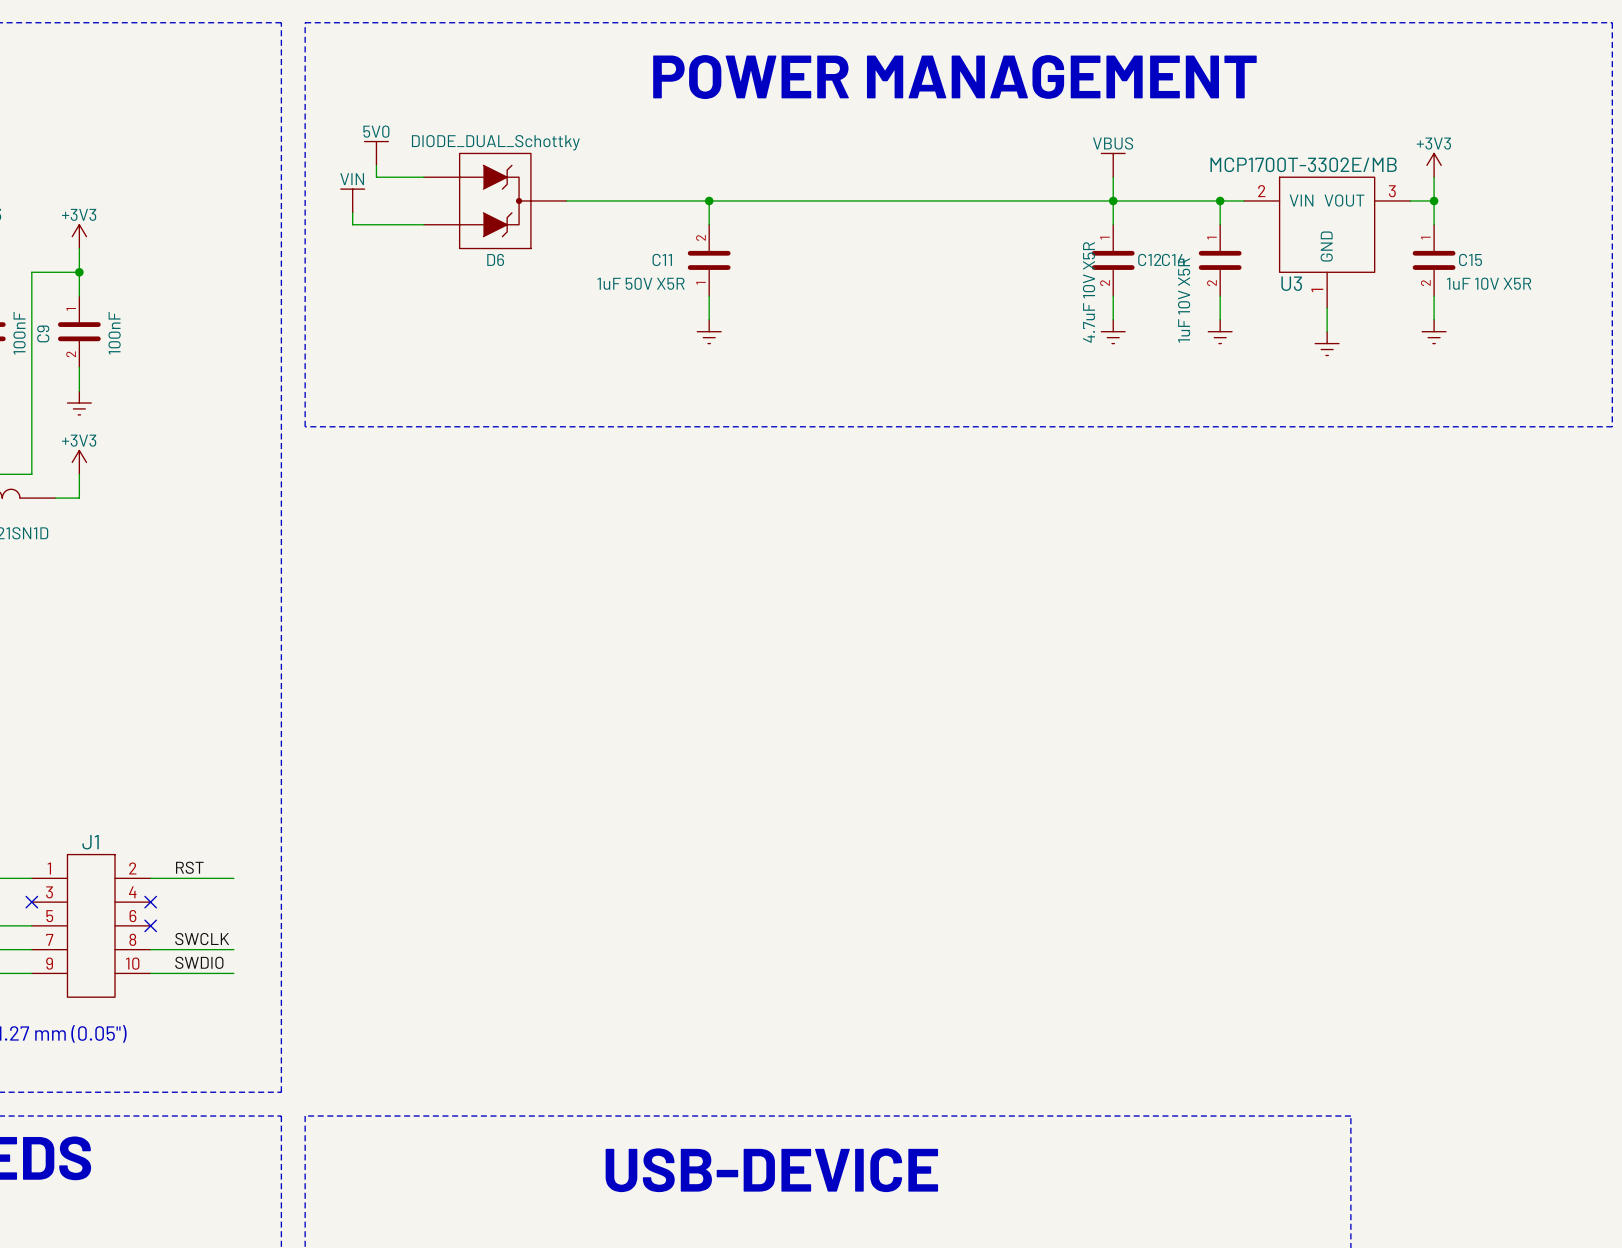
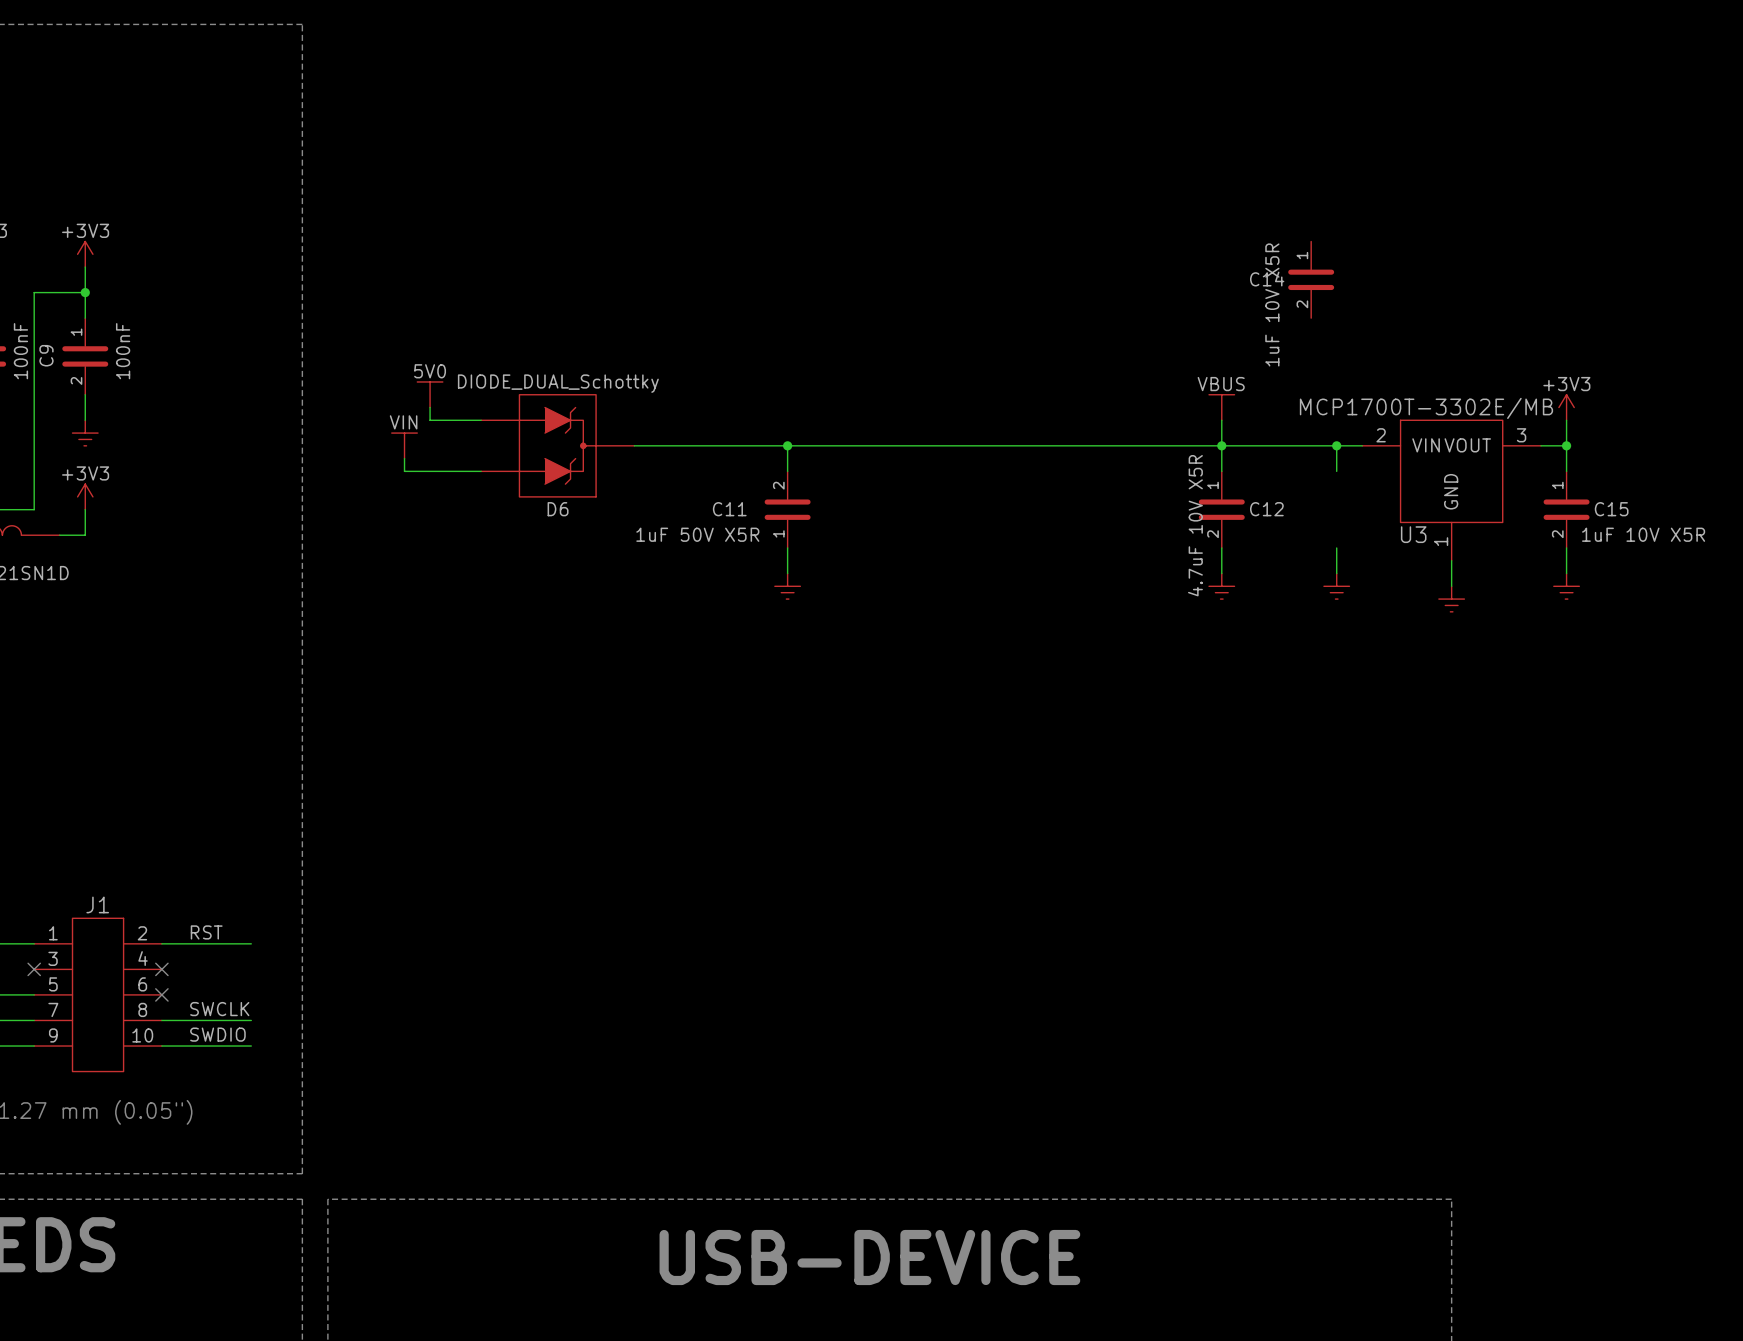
line: (305, 22) (1612, 22) (1612, 426) (305, 426) (305, 22) -> none
text: POWER MANAGEMENT (954, 77) -> none
power symbol position: 5V0 (376, 153) -> 5V0 (430, 394)
wire: (376, 165) (376, 177) (423, 177) -> (430, 407) (430, 420) (481, 420)
power symbol position: VBUS (1113, 165) -> VBUS (1221, 407)
power symbol position: +3V3 (1434, 165) -> +3V3 (1566, 407)
wire: (1113, 177) (1113, 224) -> (1221, 420) (1221, 471)
wire: (1434, 177) (1434, 224) -> (1566, 420) (1566, 471)
power symbol position: VIN (352, 200) -> VIN (404, 445)
D6 position: (495, 200) -> (557, 445)
wire: (566, 200) (1243, 200) -> (634, 445) (1362, 445)
wire: (709, 200) (709, 224) -> (787, 445) (787, 471)
junction: (709, 200) -> none
junction: (1113, 200) -> none
wire: (1220, 200) (1220, 224) -> (1336, 445) (1336, 471)
junction: (1220, 200) -> none
wire: (1410, 200) (1434, 200) -> (1541, 445) (1566, 445)
junction: (1434, 200) -> none
wire: (352, 212) (352, 224) (423, 224) -> (404, 458) (404, 471) (481, 471)
U3 position: (1327, 242) -> (1451, 490)
C11 position: (709, 260) -> (787, 509)
C12 position: (1113, 260) -> (1221, 509)
C15 position: (1434, 260) -> (1566, 509)
wire: (709, 296) (709, 319) -> (787, 547) (787, 573)
wire: (1113, 296) (1113, 319) -> (1221, 547) (1221, 573)
wire: (1220, 296) (1220, 319) -> (1336, 547) (1336, 573)
wire: (1434, 296) (1434, 319) -> (1566, 547) (1566, 573)
wire: (1327, 307) (1327, 331) -> (1451, 560) (1451, 586)
power symbol position: (709, 331) -> (787, 586)
power symbol: (1113, 331) -> none
power symbol: (1220, 331) -> none
power symbol: (1434, 331) -> none
power symbol: (1327, 343) -> none
junction: none -> (787, 445)
junction: none -> (1221, 445)
junction: none -> (1336, 445)
junction: none -> (1566, 445)
power symbol: none -> (1221, 586)
power symbol: none -> (1336, 586)
power symbol: none -> (1566, 586)
power symbol: none -> (1451, 599)

